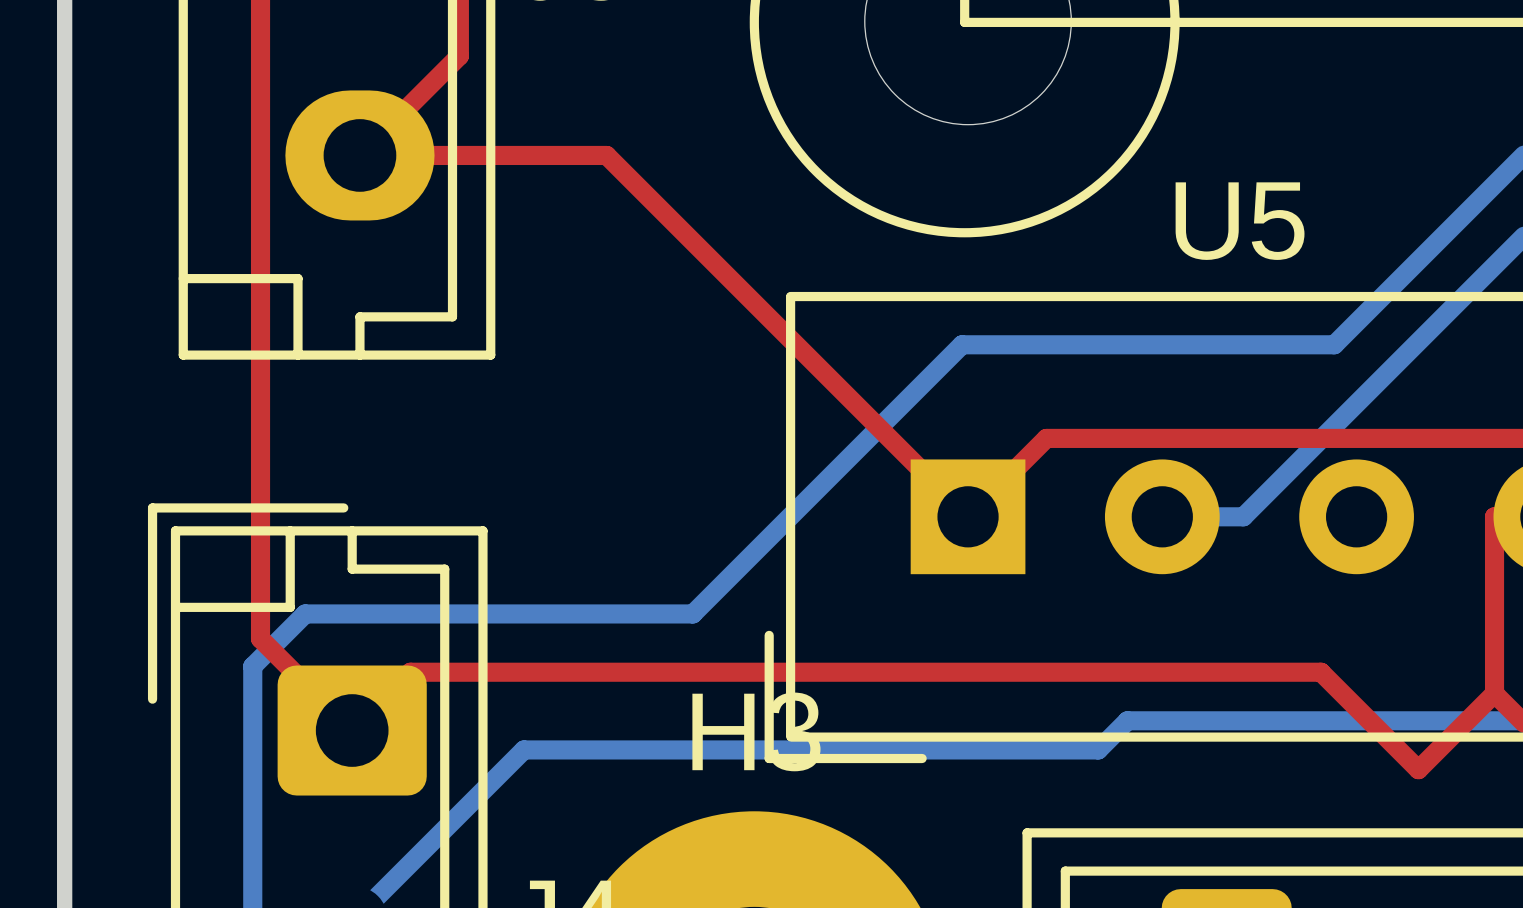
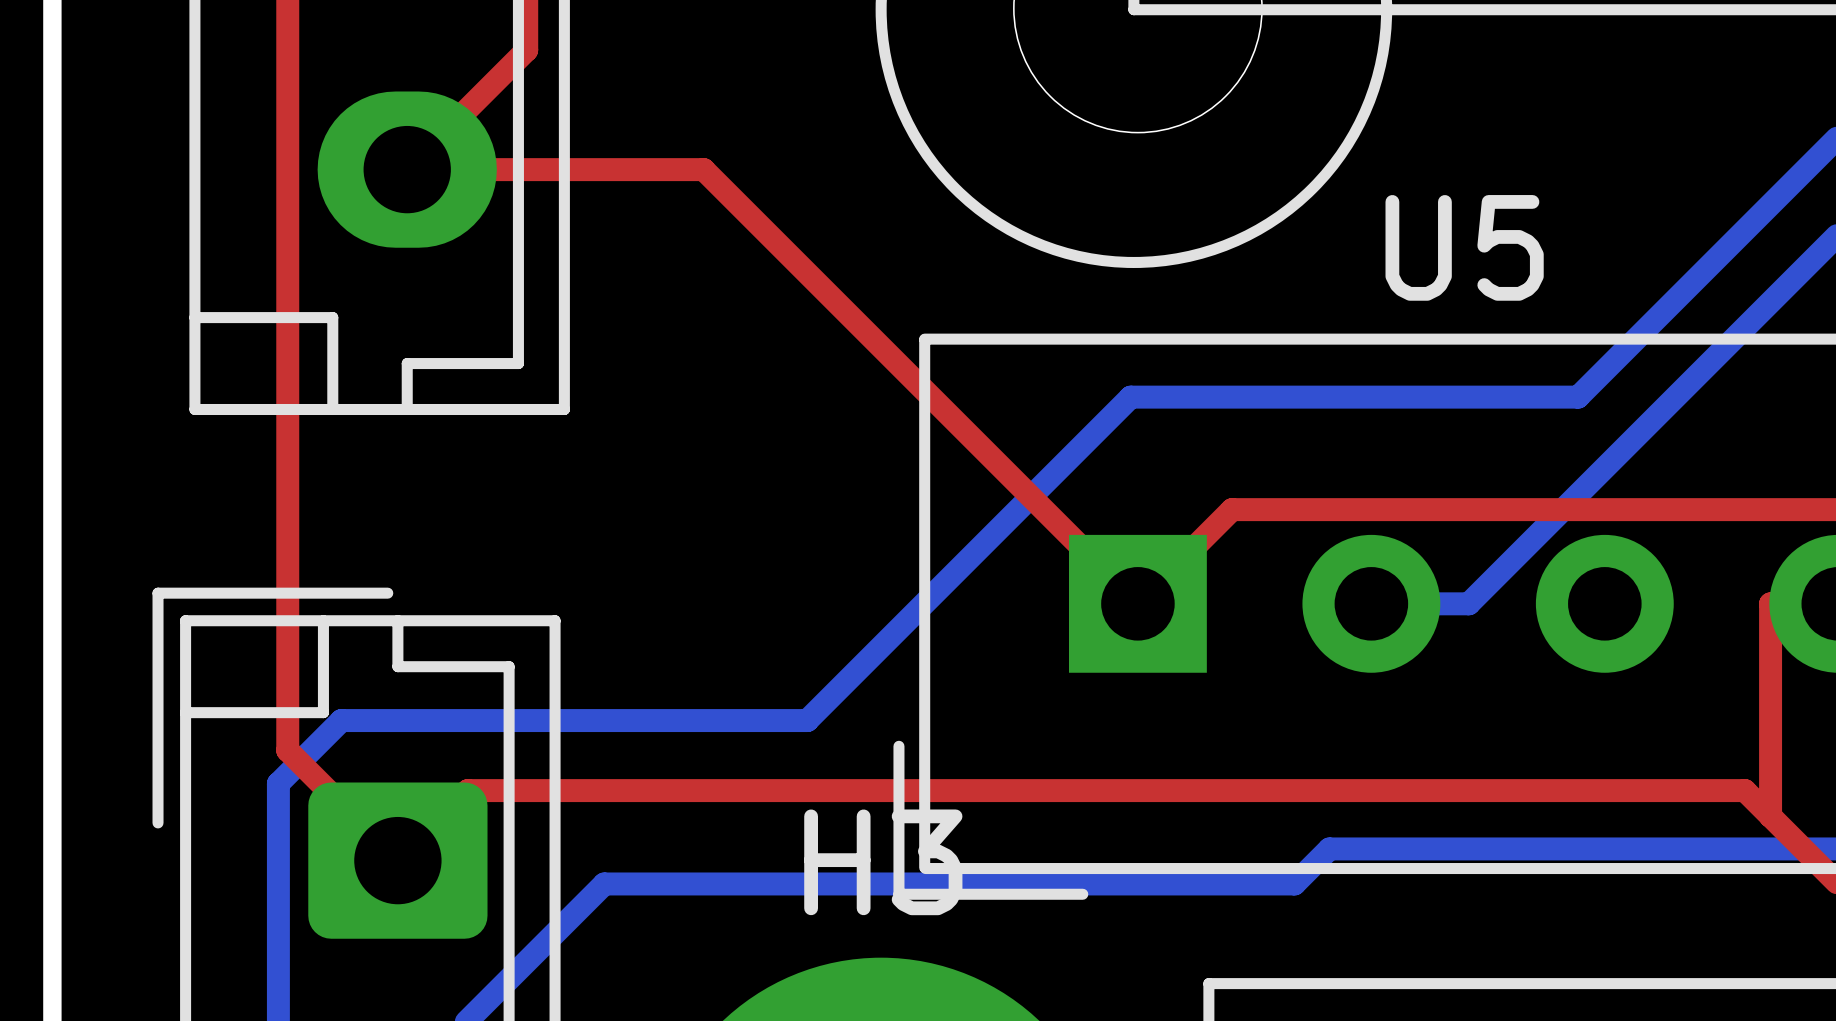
top track: (1321, 672) (1418, 769) (1494, 693) -> (1562, 790) (1744, 790) (1770, 816)

